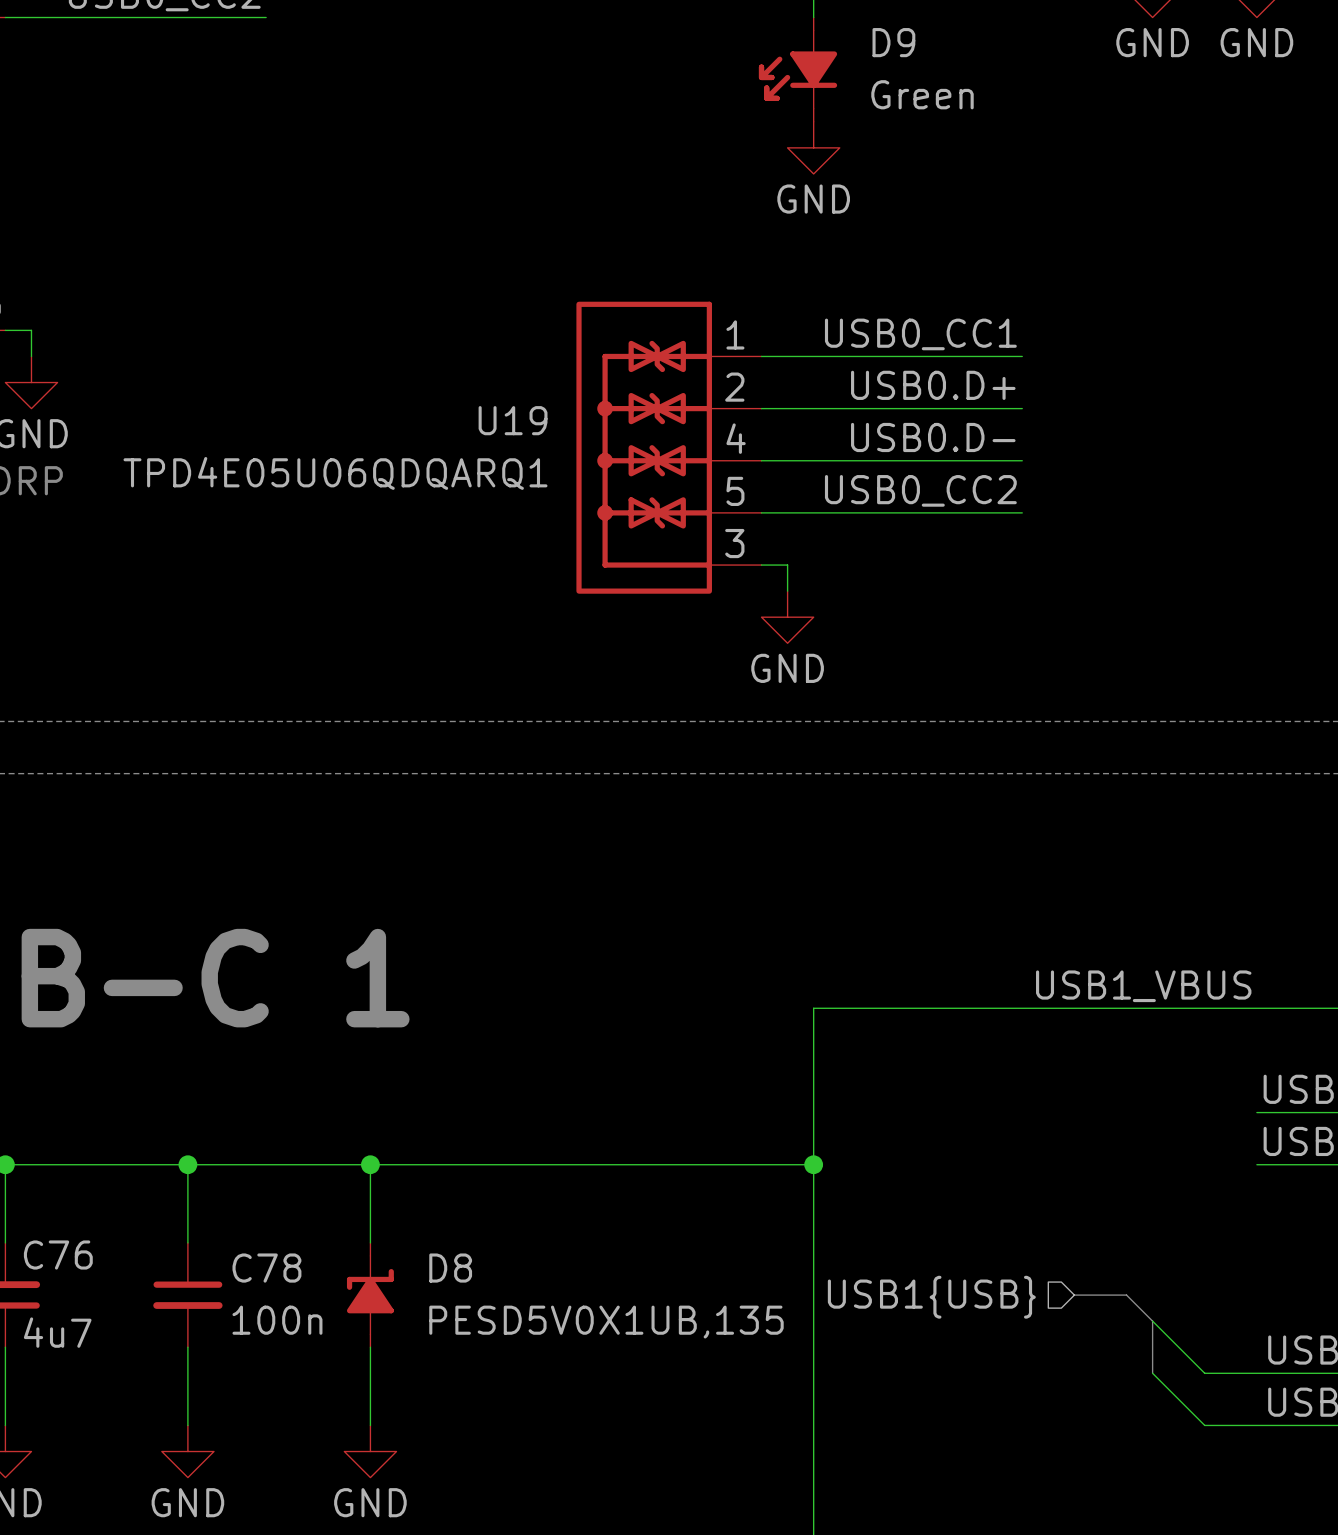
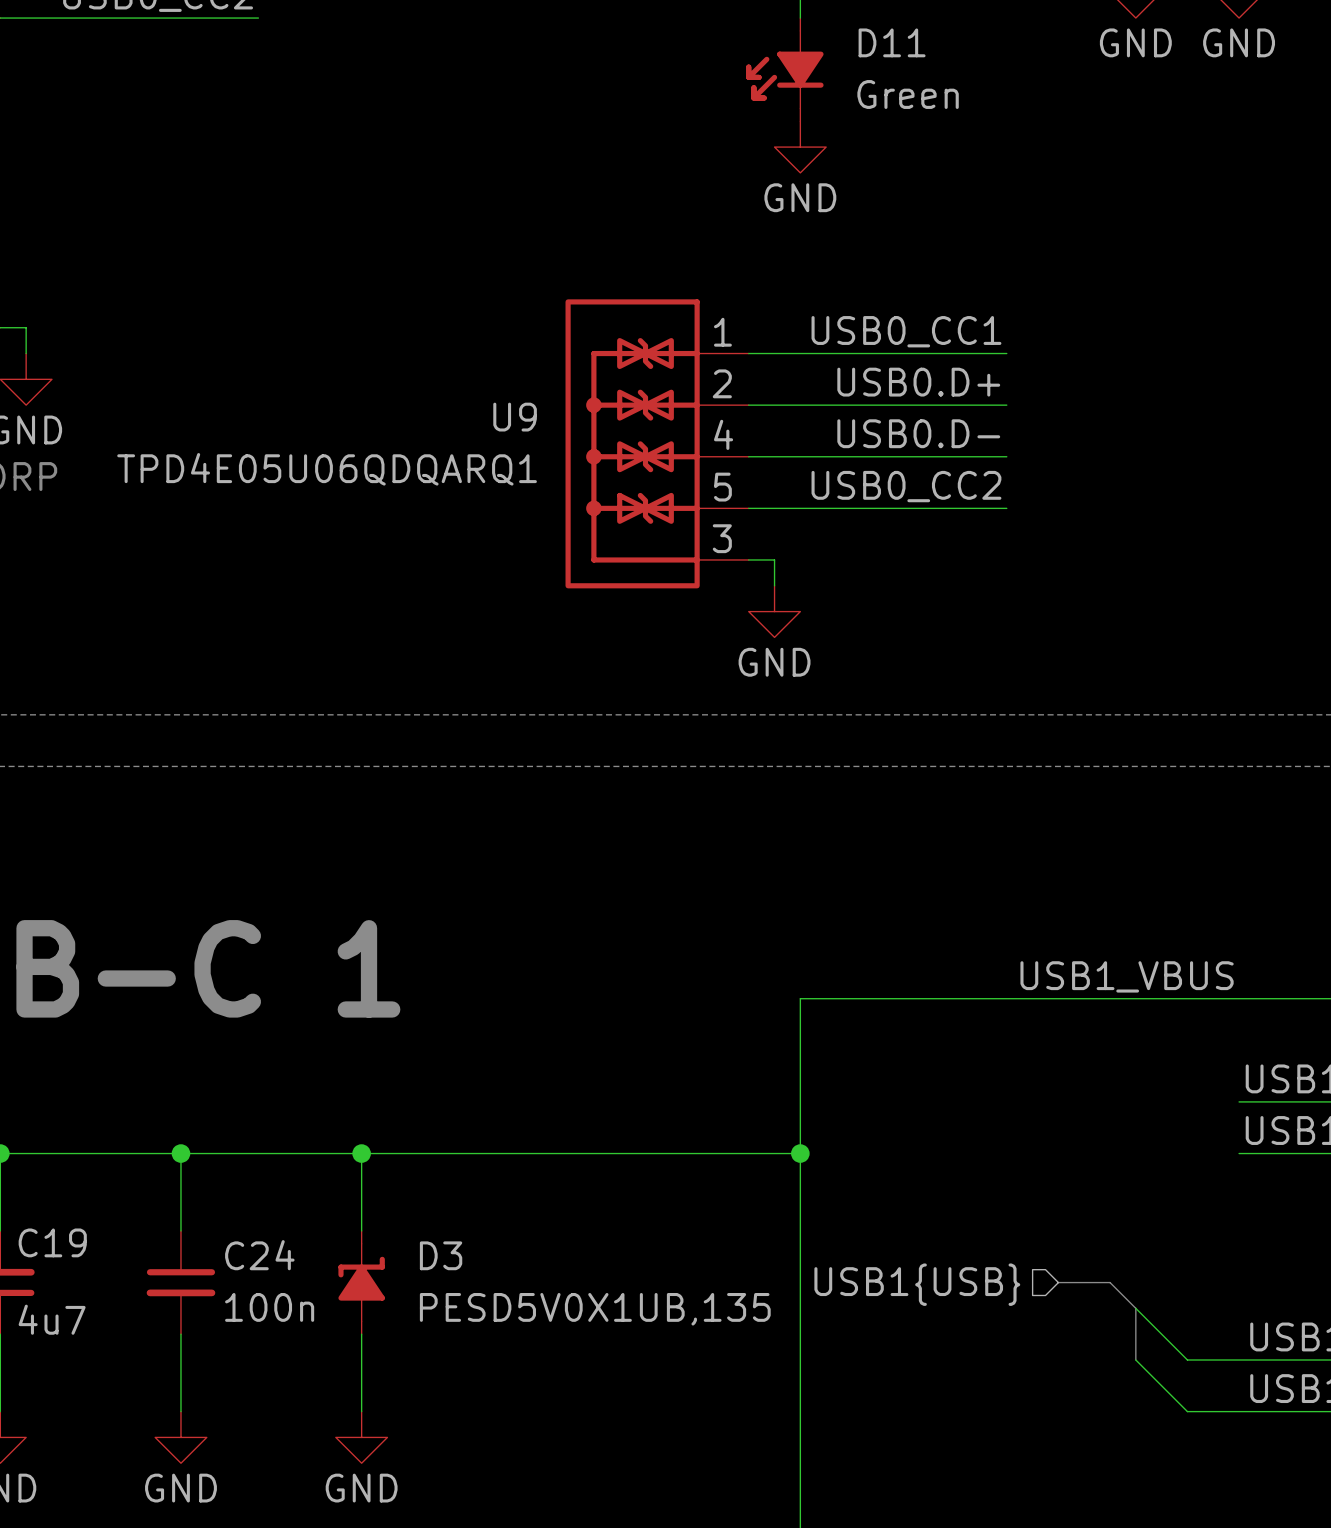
D9 name: D9 (893, 42) -> D11 (892, 42)
U19 name: U19 (513, 420) -> U9 (515, 417)
C76 name: C76 (58, 1255) -> C19 (52, 1242)
C78 name: C78 (266, 1268) -> C24 (259, 1255)
D8 name: D8 (450, 1268) -> D3 (441, 1255)

